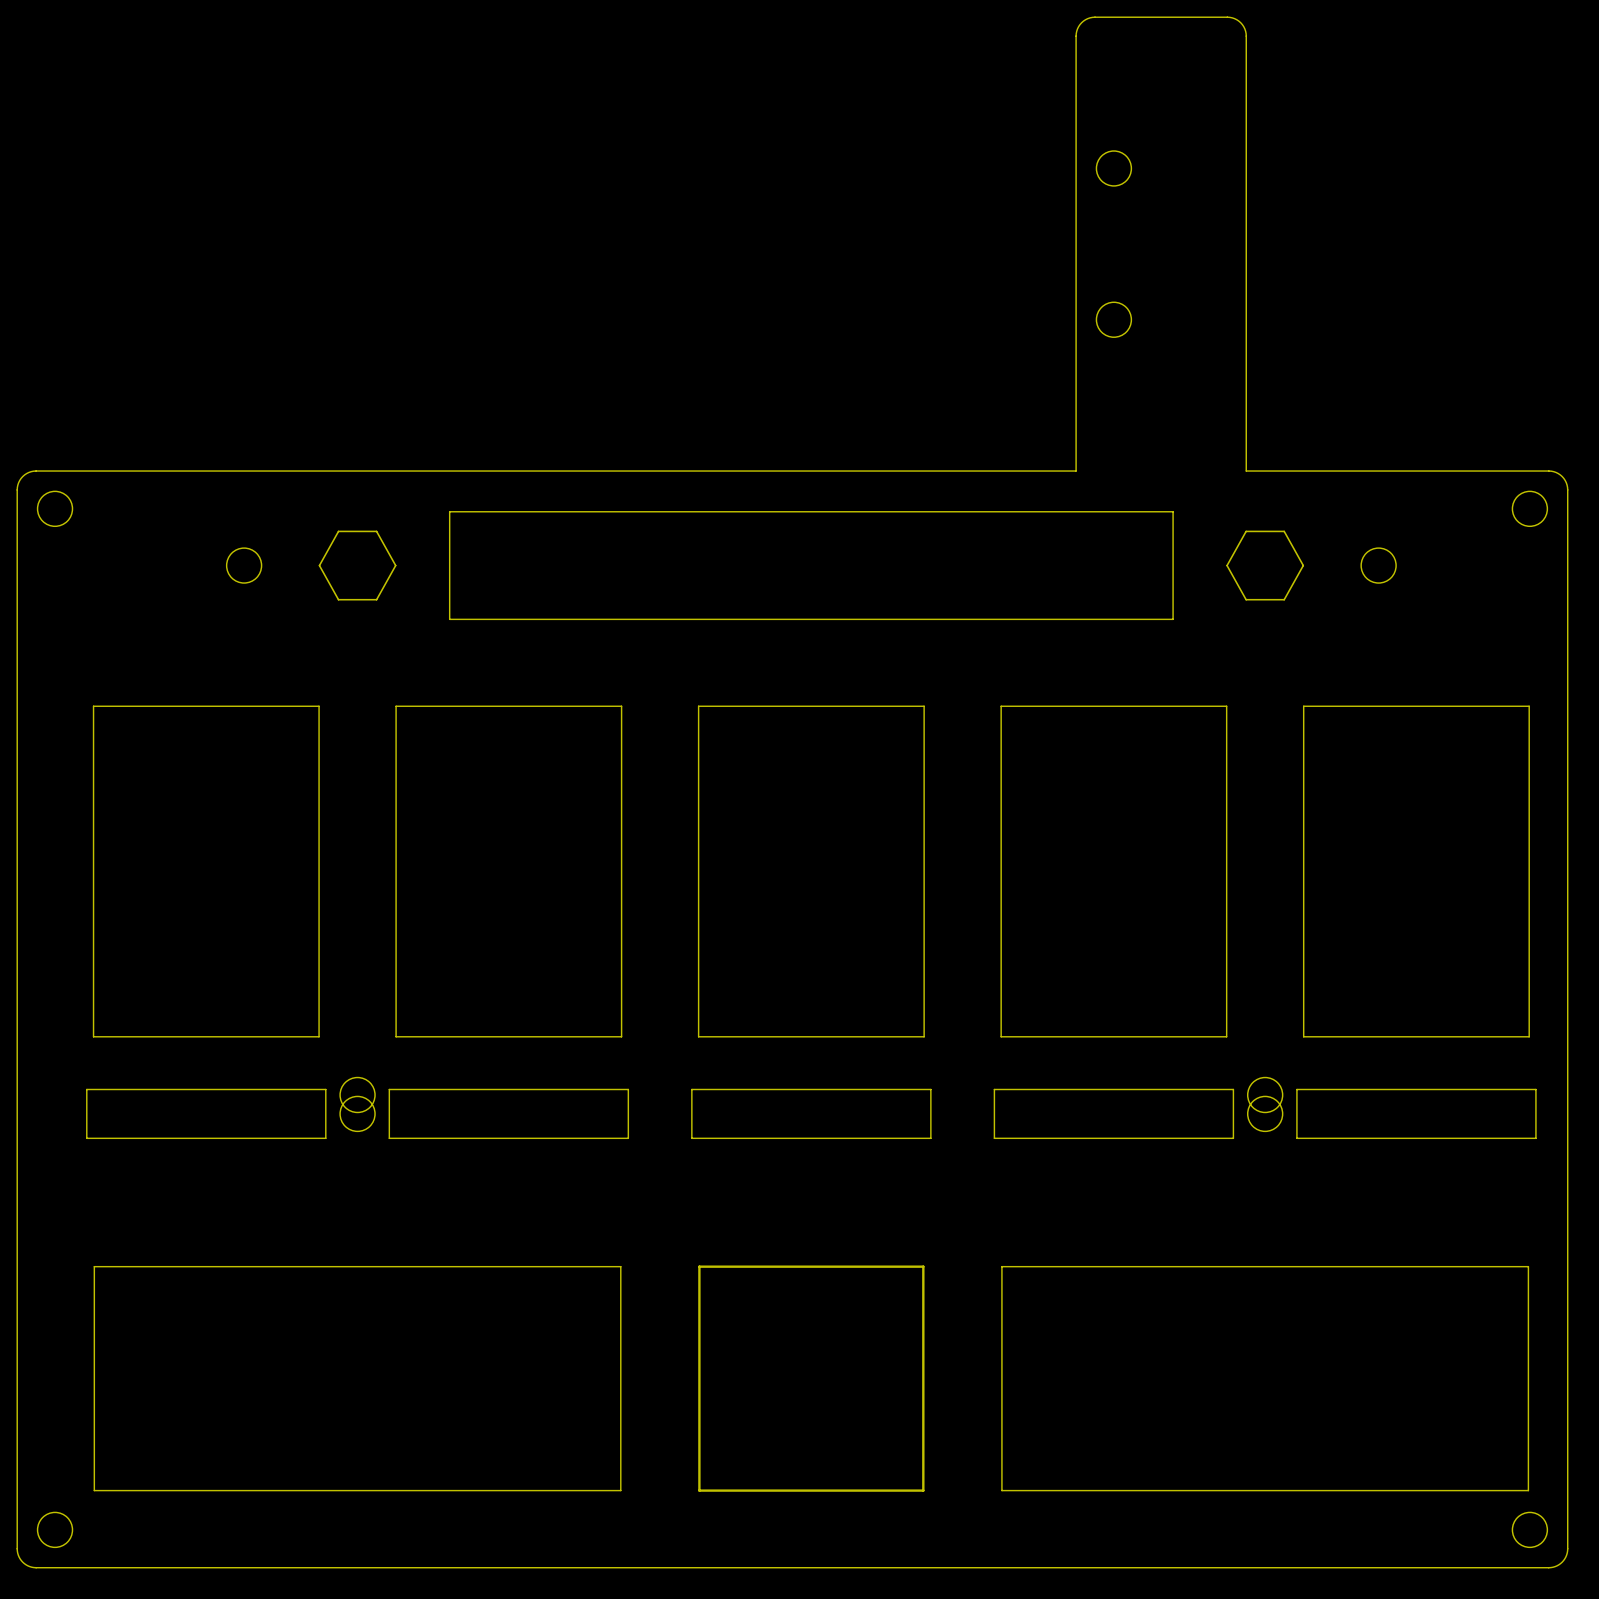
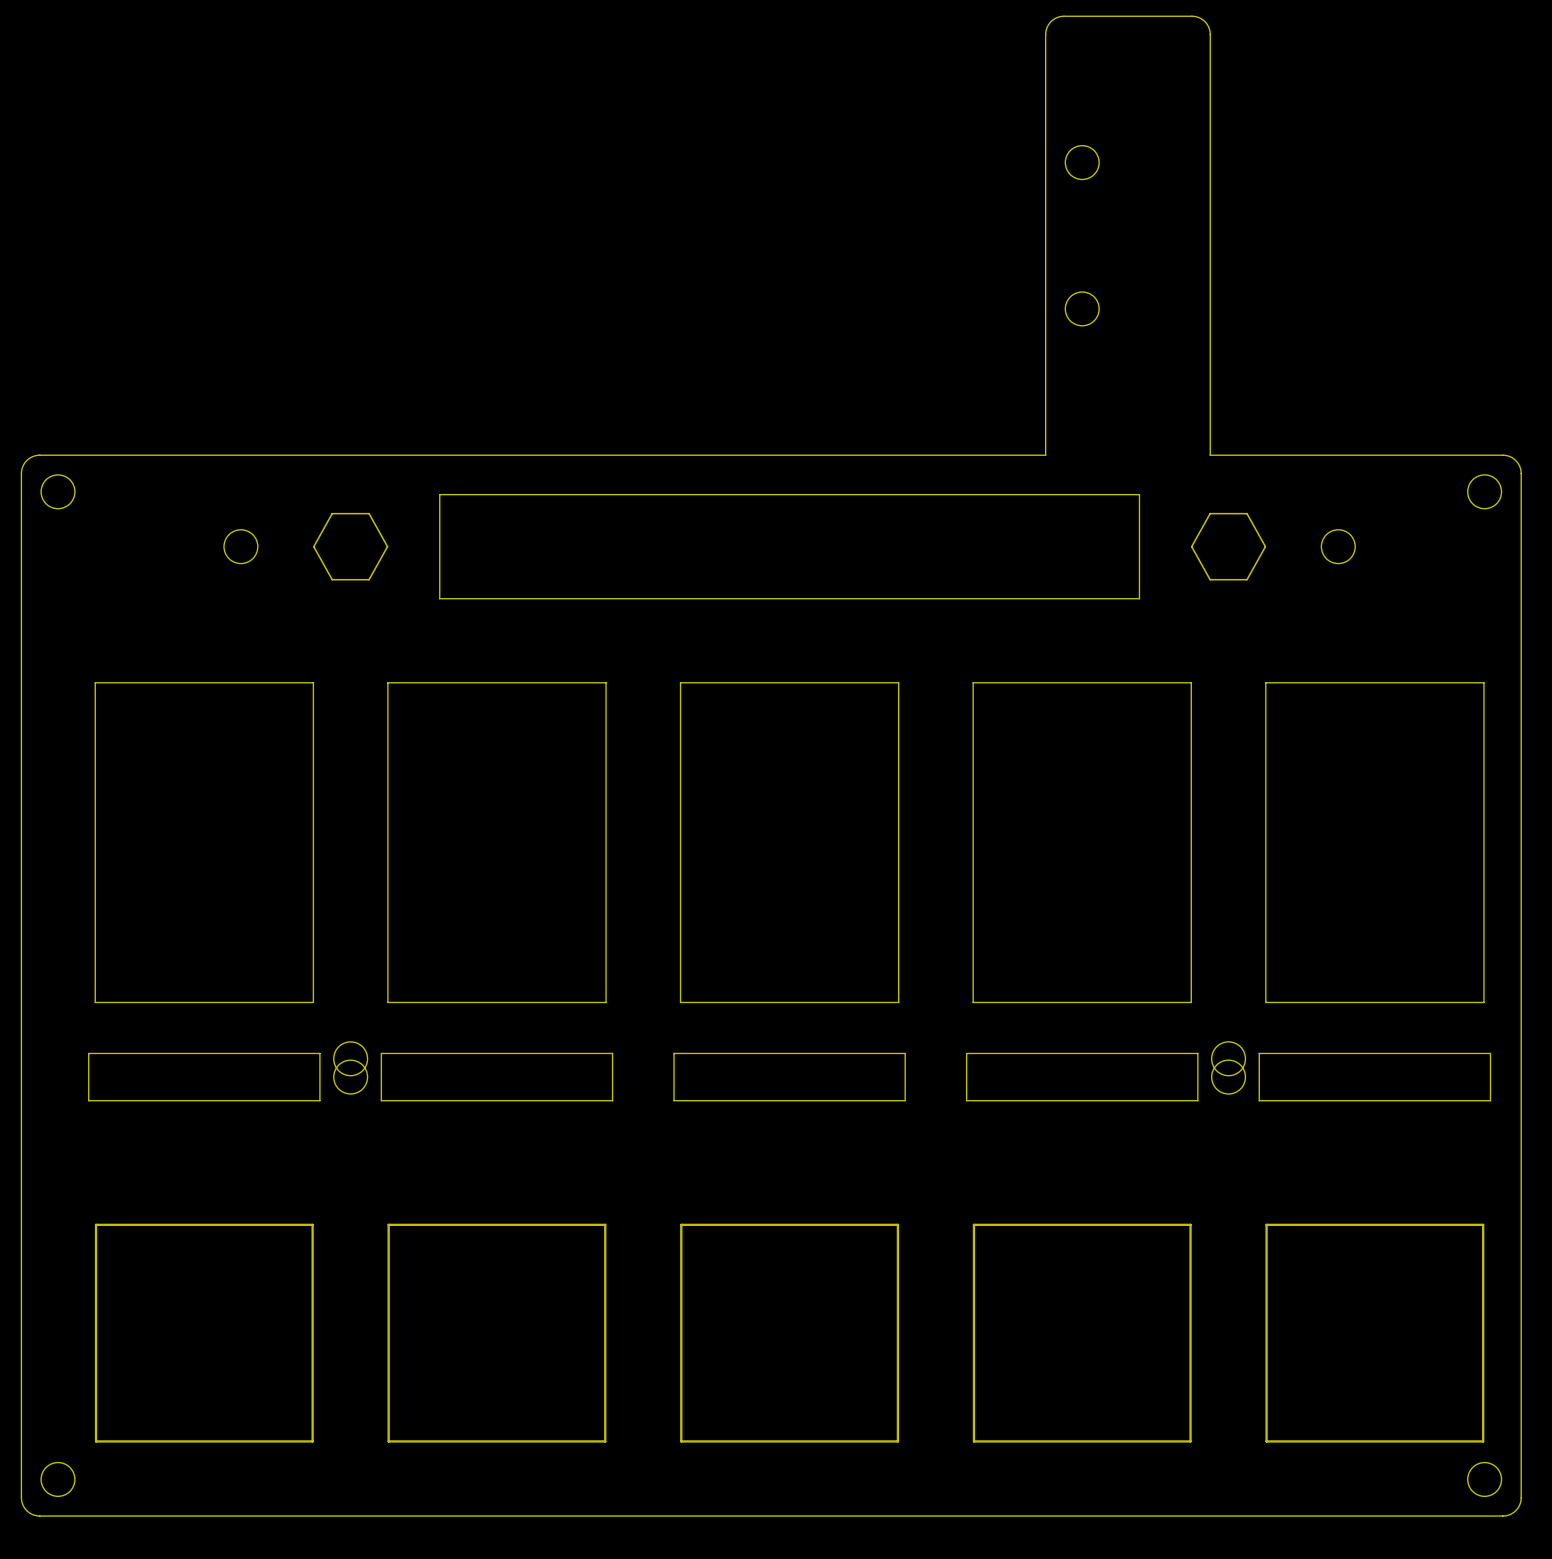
drawing: none -> [94, 1223, 314, 1443]
drawing: none -> [387, 1223, 607, 1443]
drawing: none -> [972, 1223, 1192, 1443]
drawing: none -> [1265, 1223, 1485, 1443]
board edge: (94, 1266) (94, 1490) (620, 1490) (620, 1266) (94, 1266) -> none
board edge: (1001, 1266) (1528, 1266) (1528, 1490) (1001, 1490) (1001, 1266) -> none

